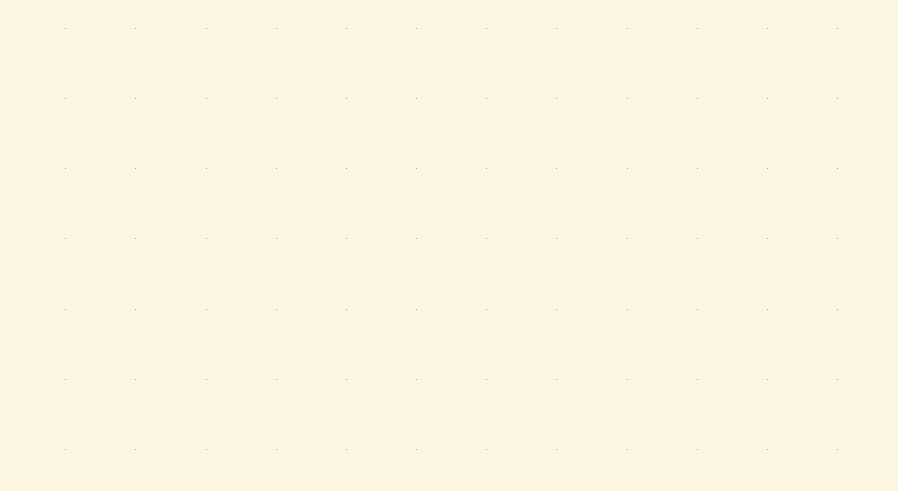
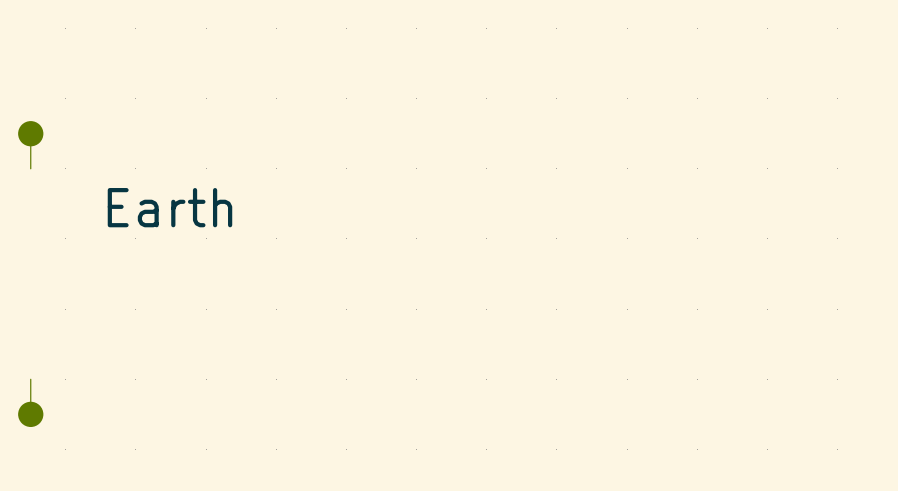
wire: none -> (30, 133) (30, 168)
junction: none -> (30, 133)
label: none -> Earth (169, 207)
wire: none -> (30, 379) (30, 414)
junction: none -> (30, 414)

